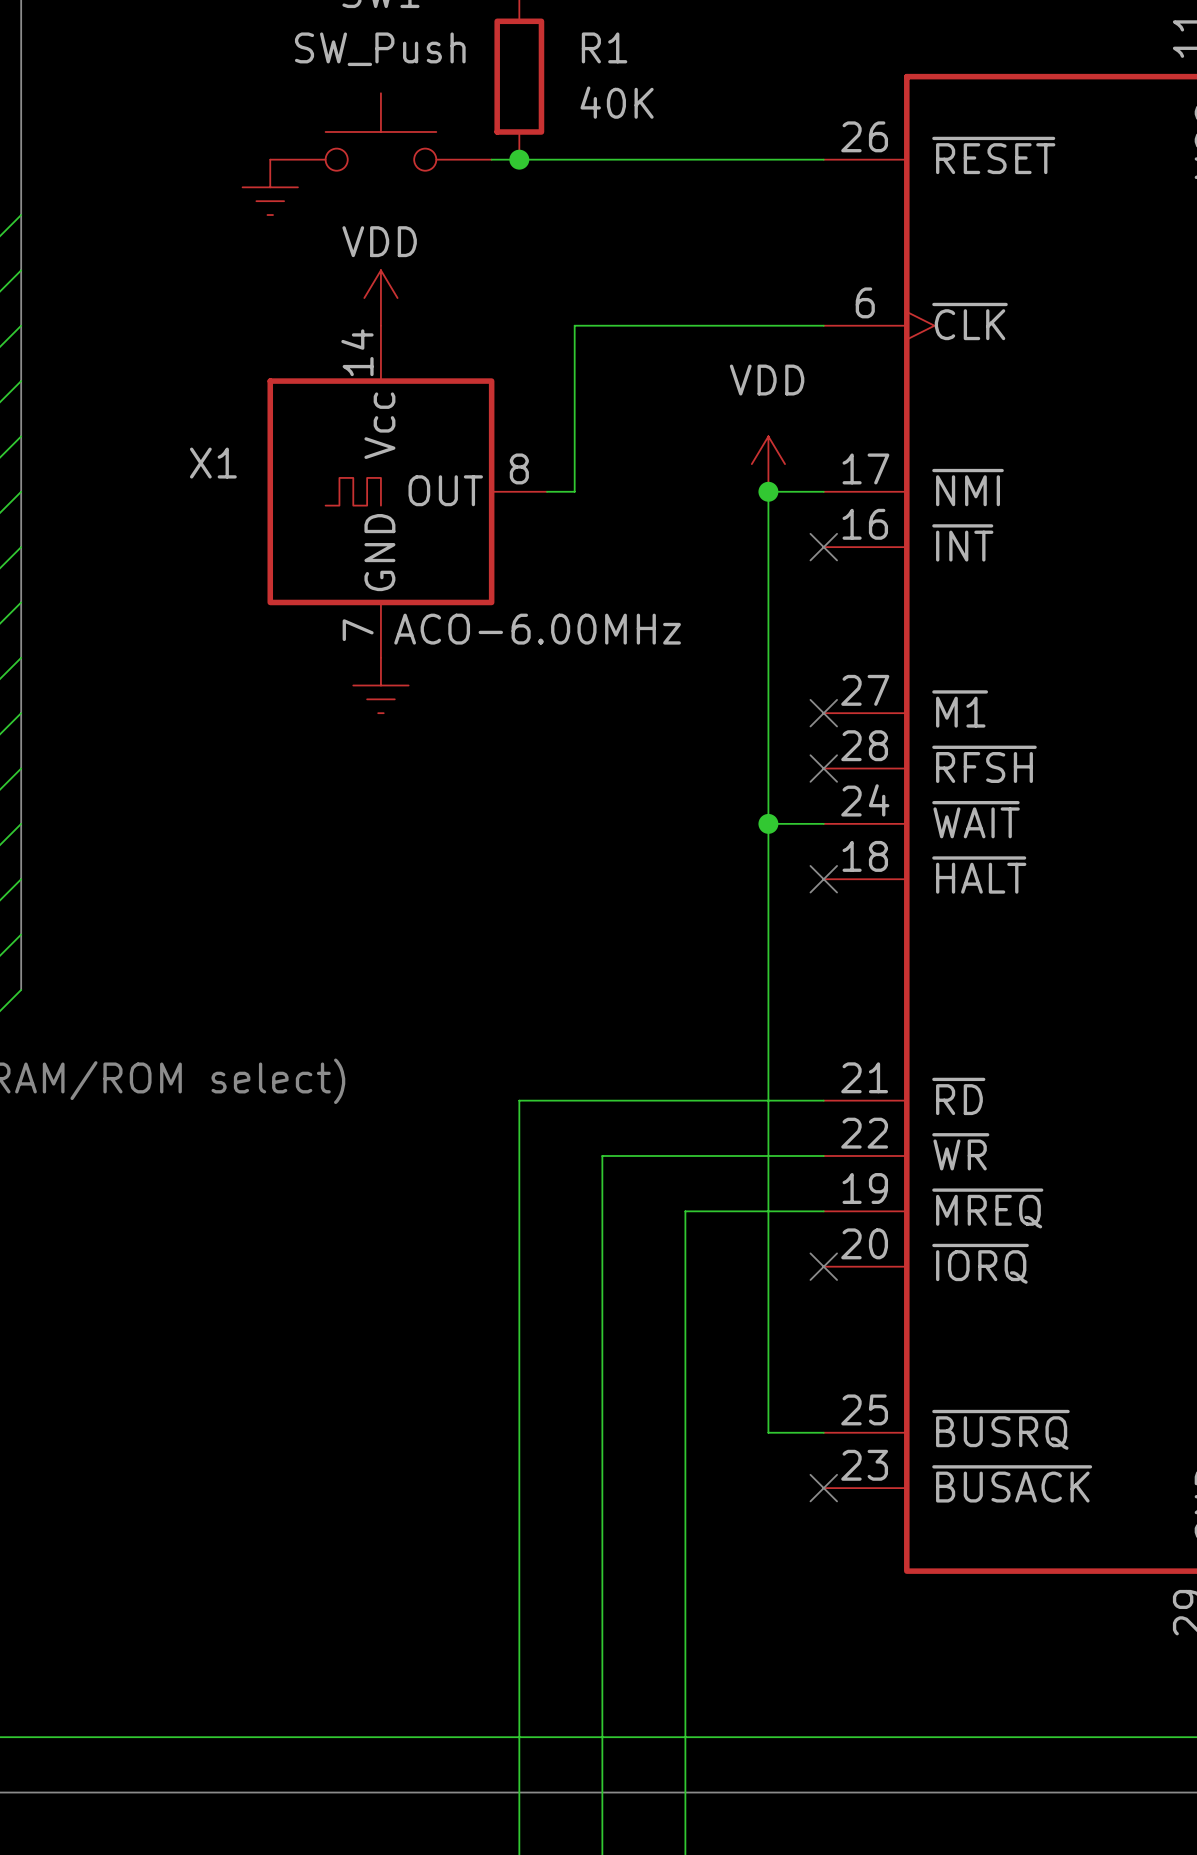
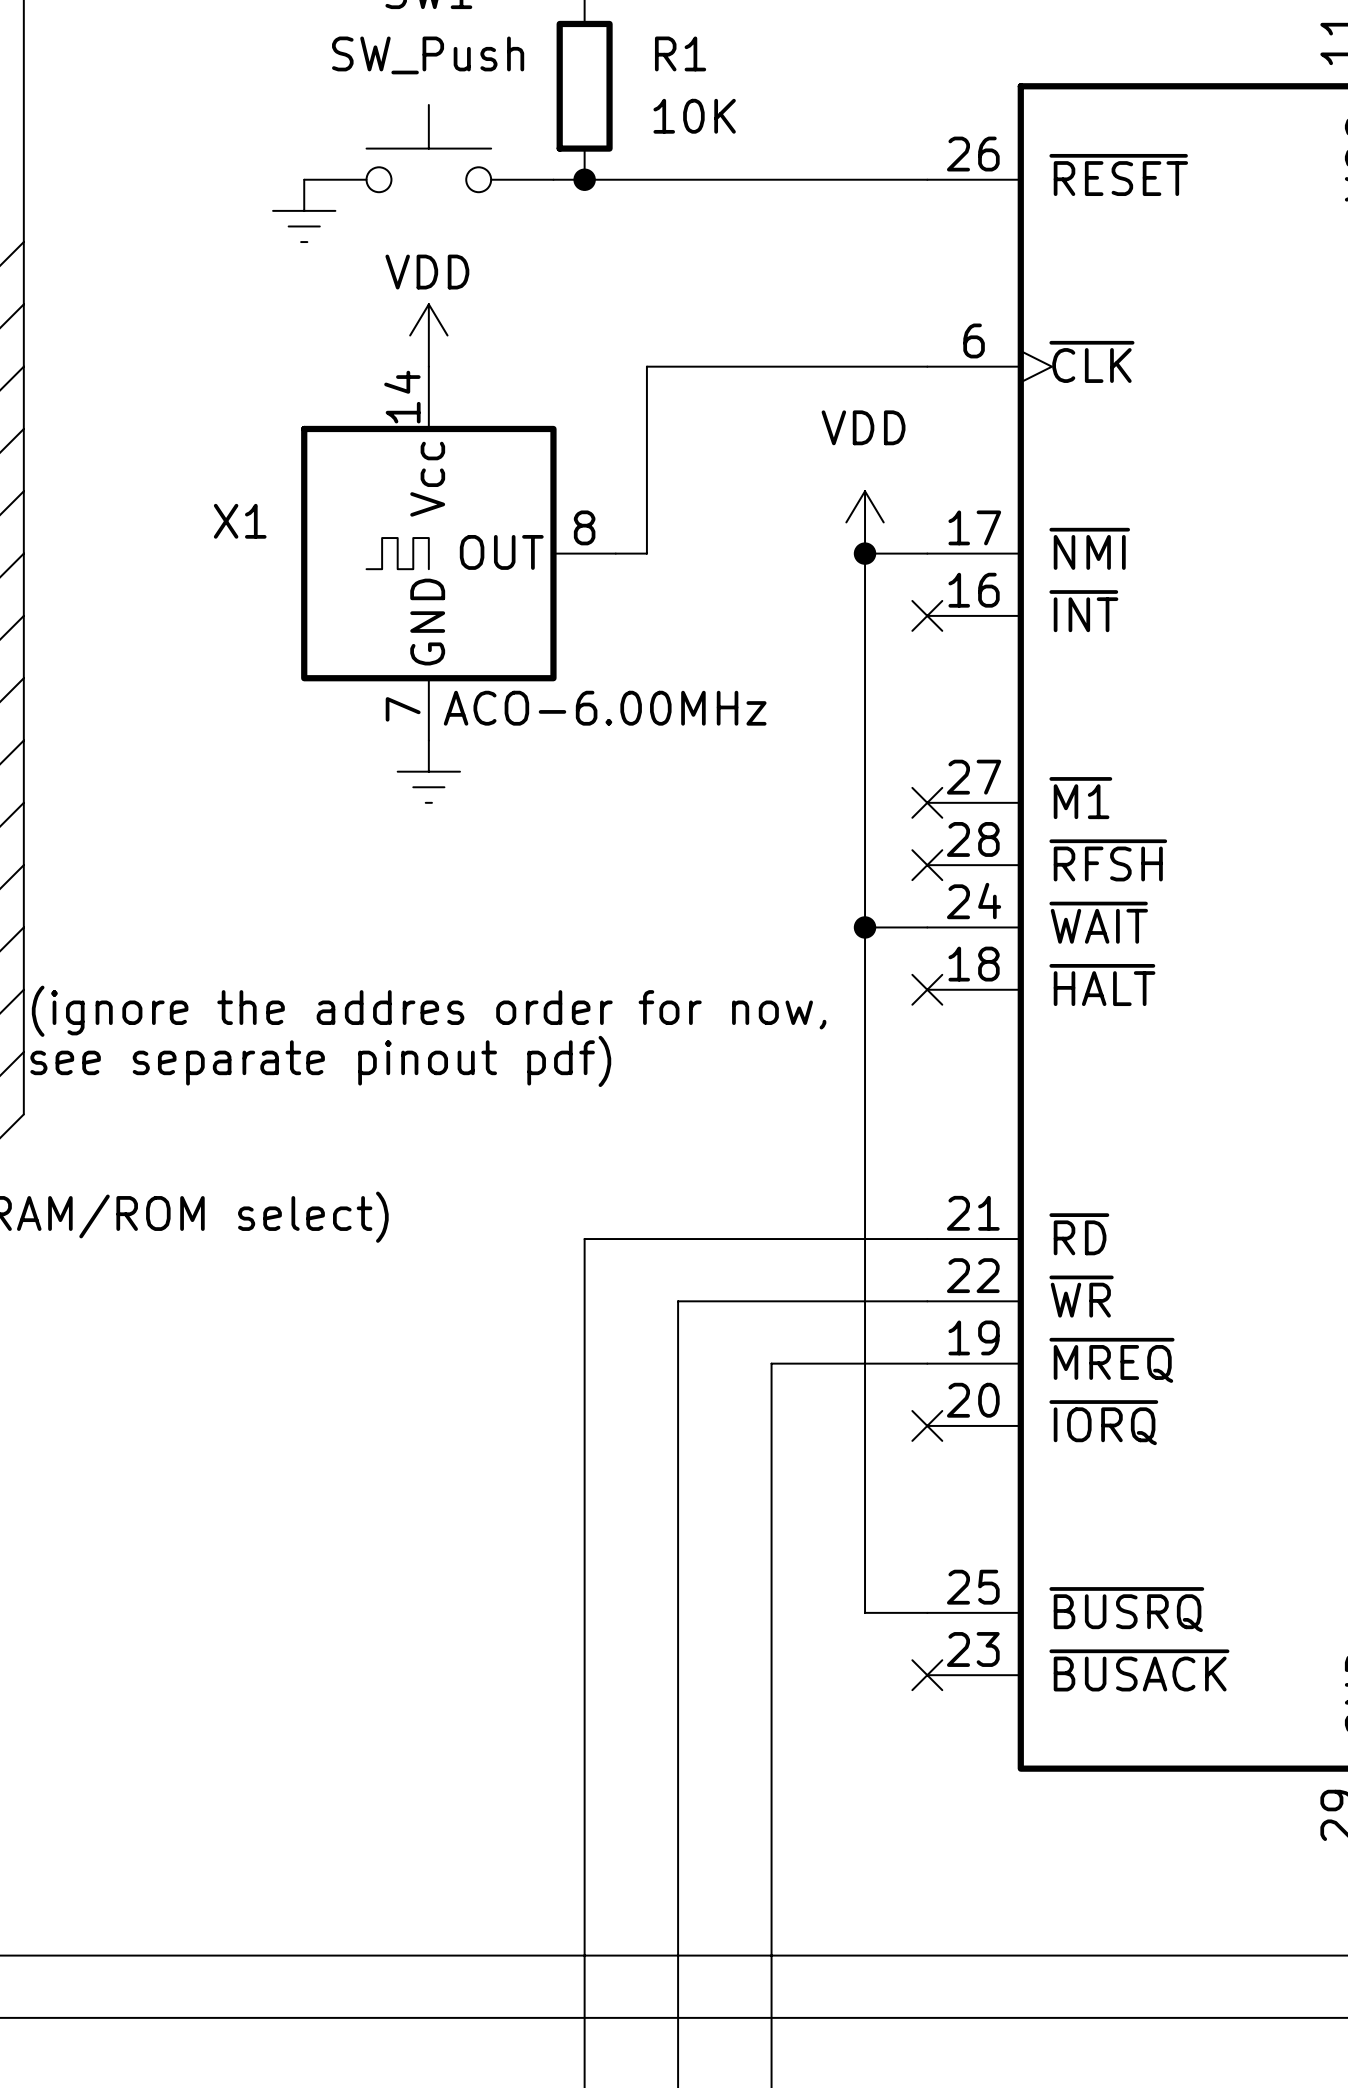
R1 value: 40K (617, 102) -> 10K (694, 116)
text: none -> (ignore the addres order for now, (429, 1011)
text: none -> see separate pinout pdf) (320, 1061)

